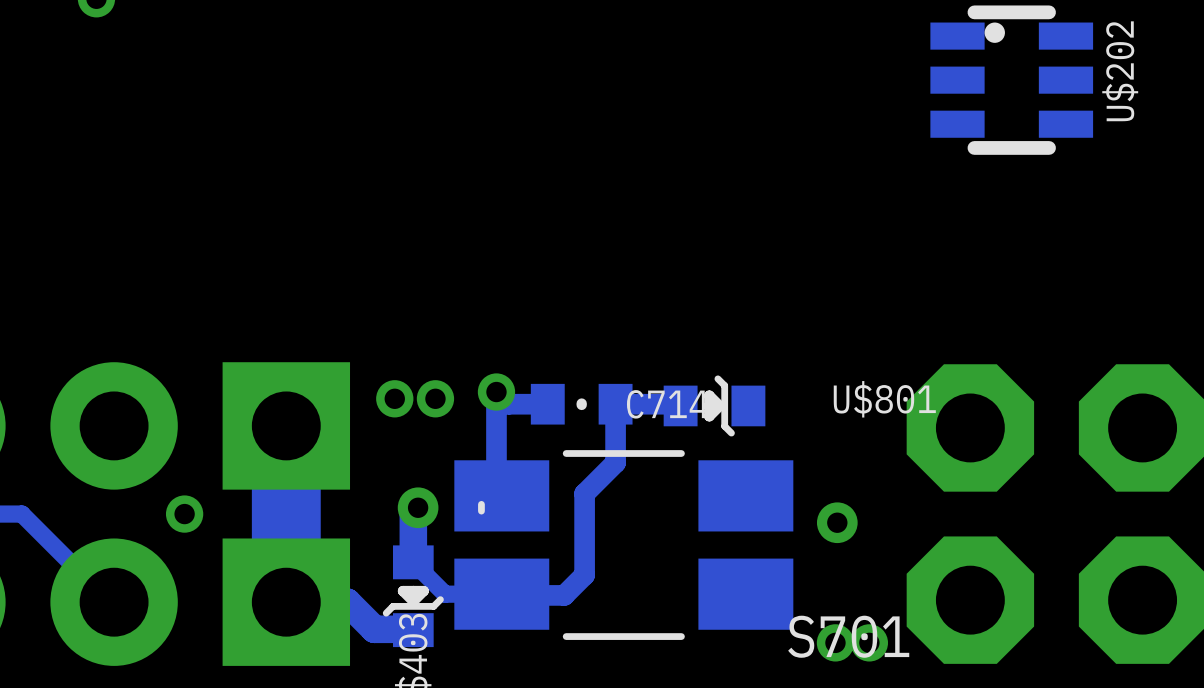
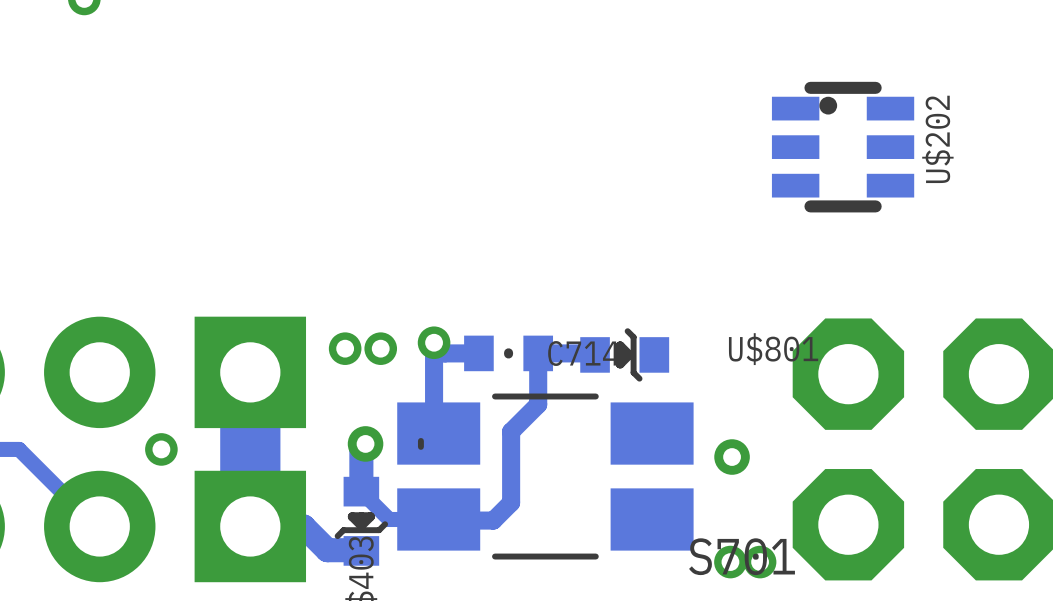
U$202 position: (1011, 80) -> (843, 147)

